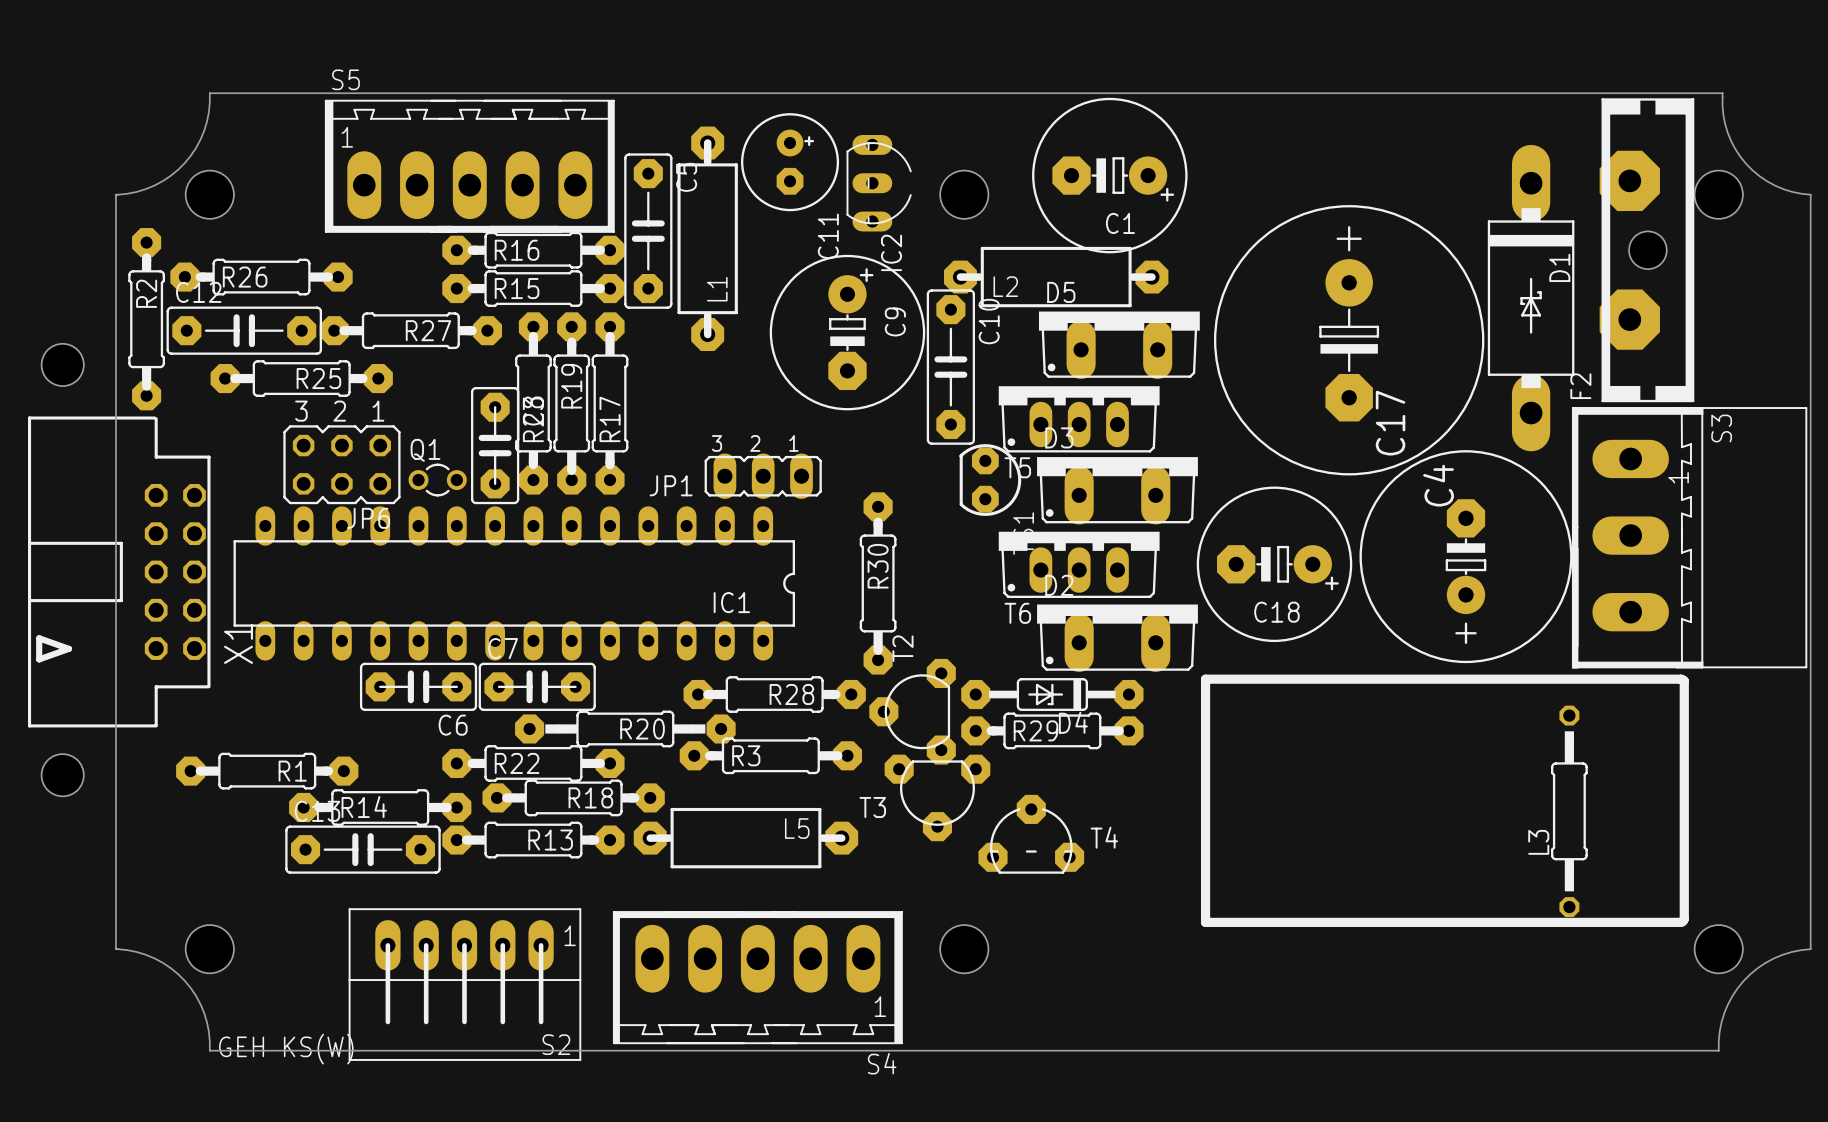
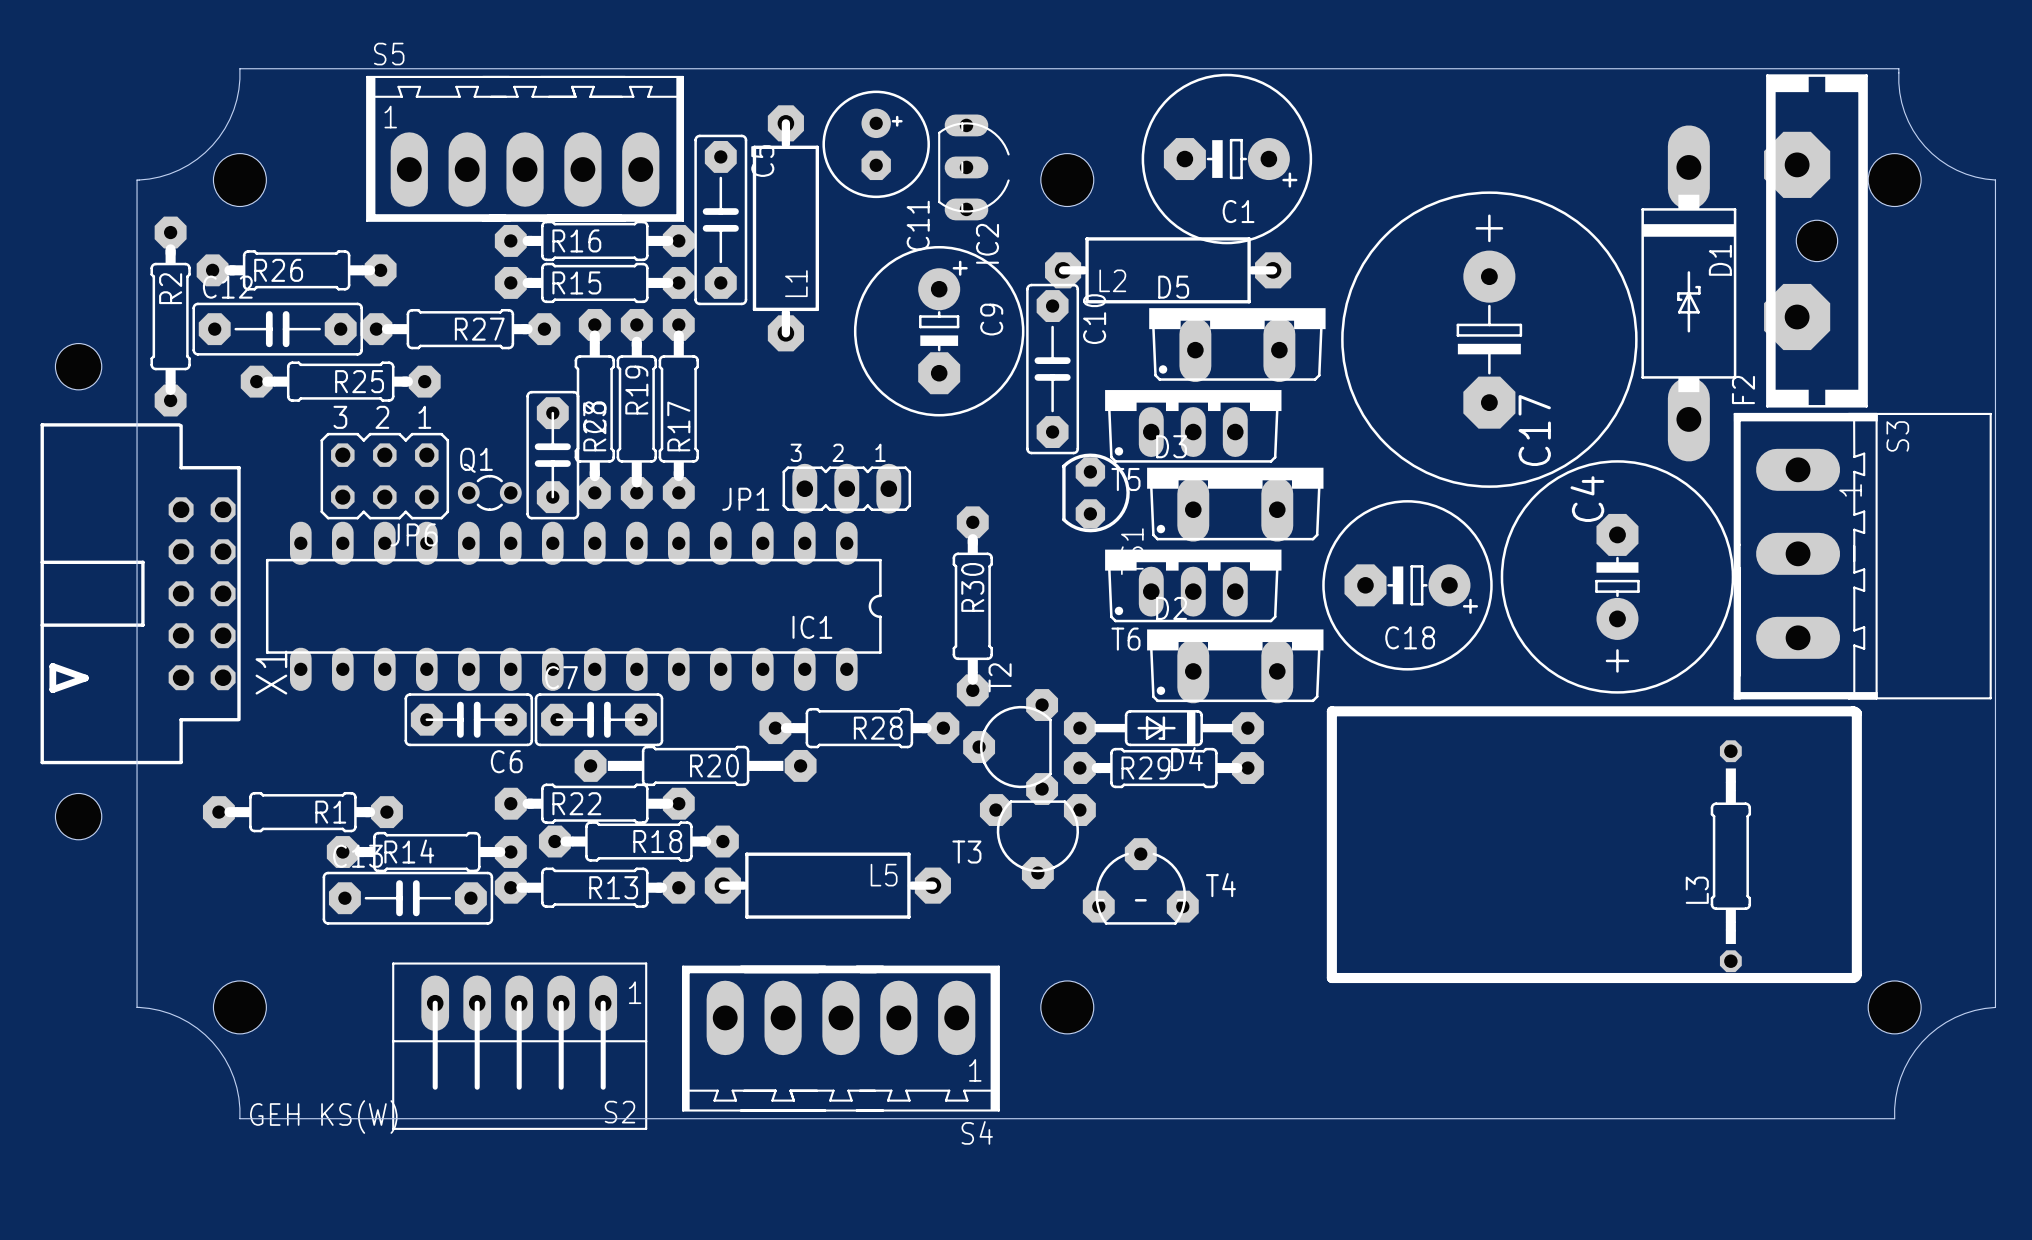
R3: (770, 755) -> none

